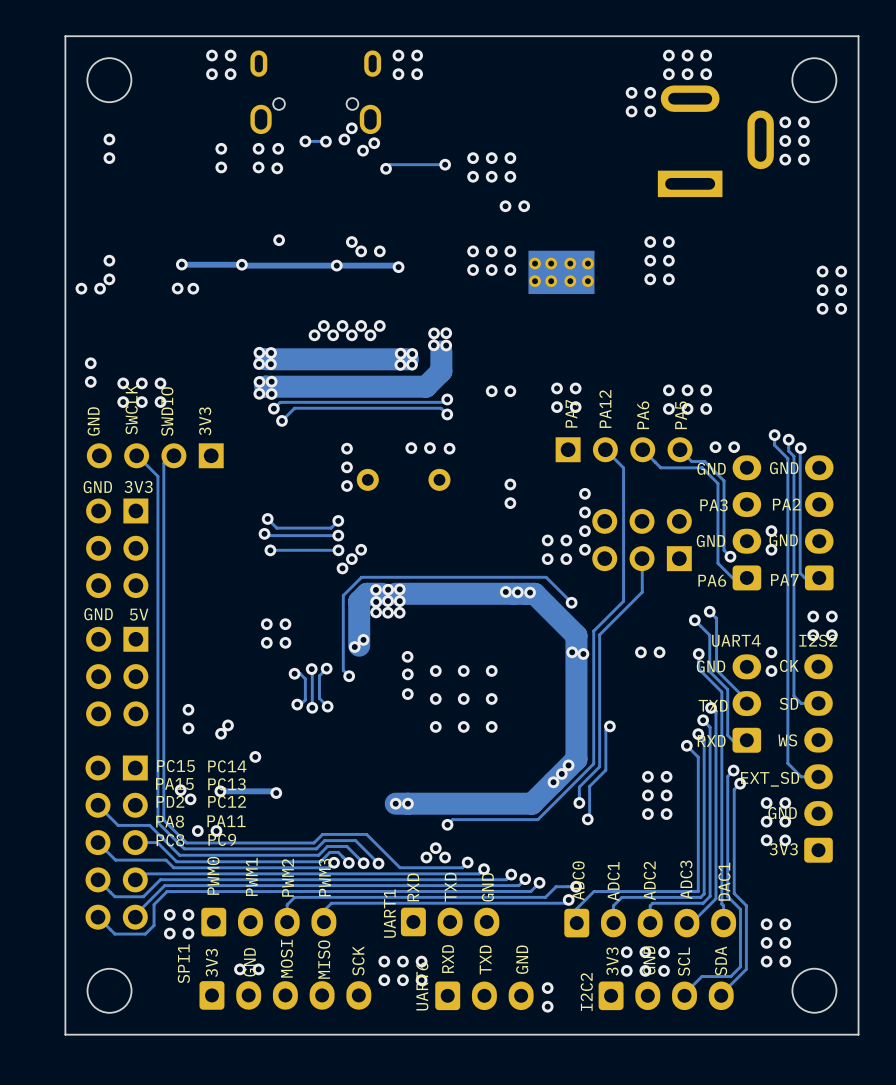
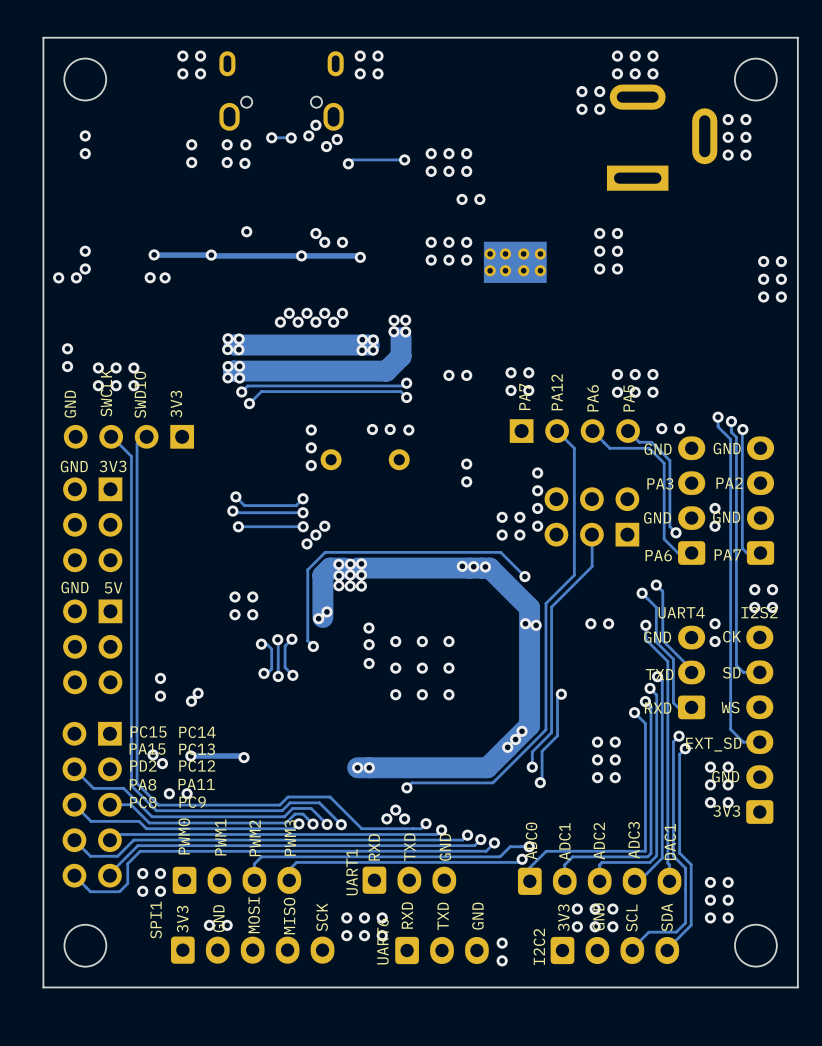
via: (255, 756) -> none

